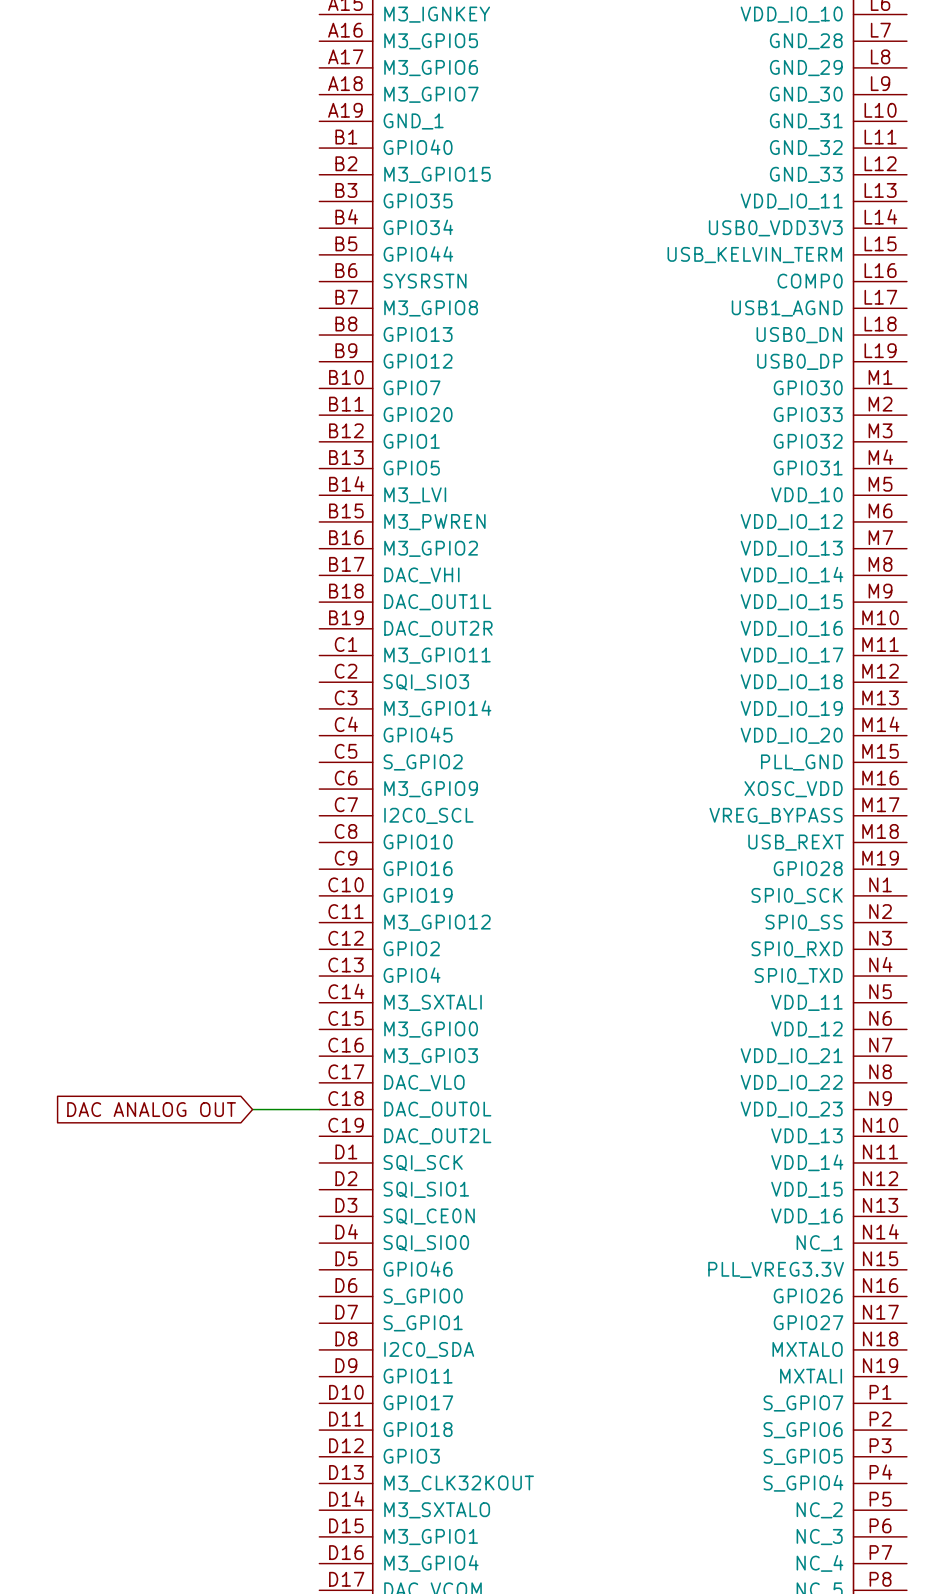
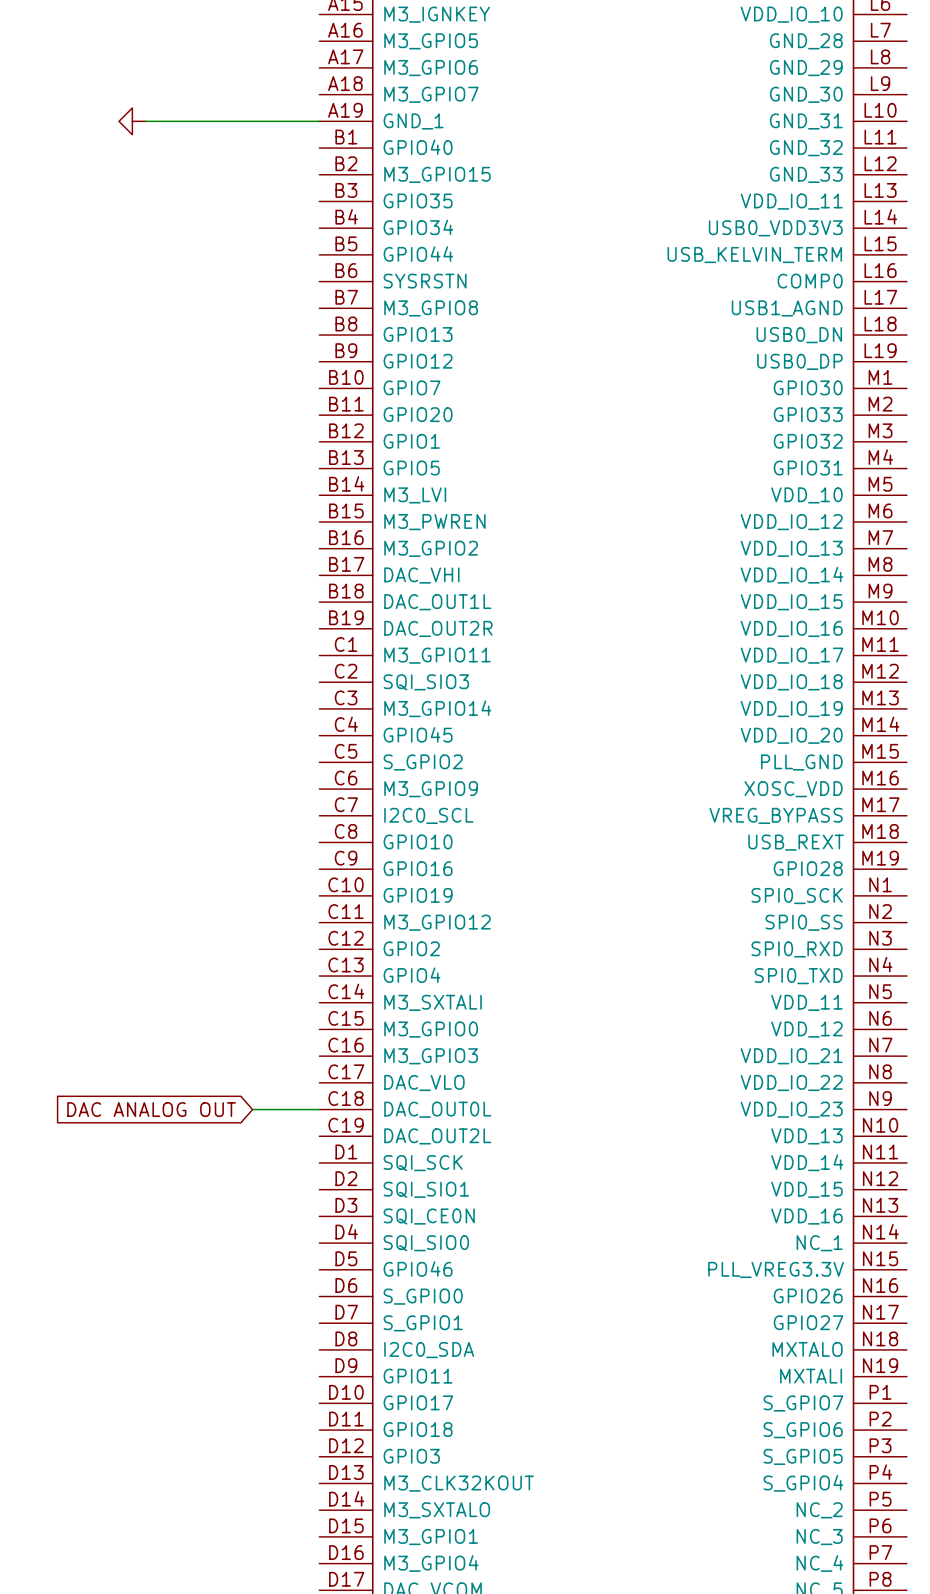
power symbol: none -> (132, 121)
wire: none -> (145, 121) (319, 121)

